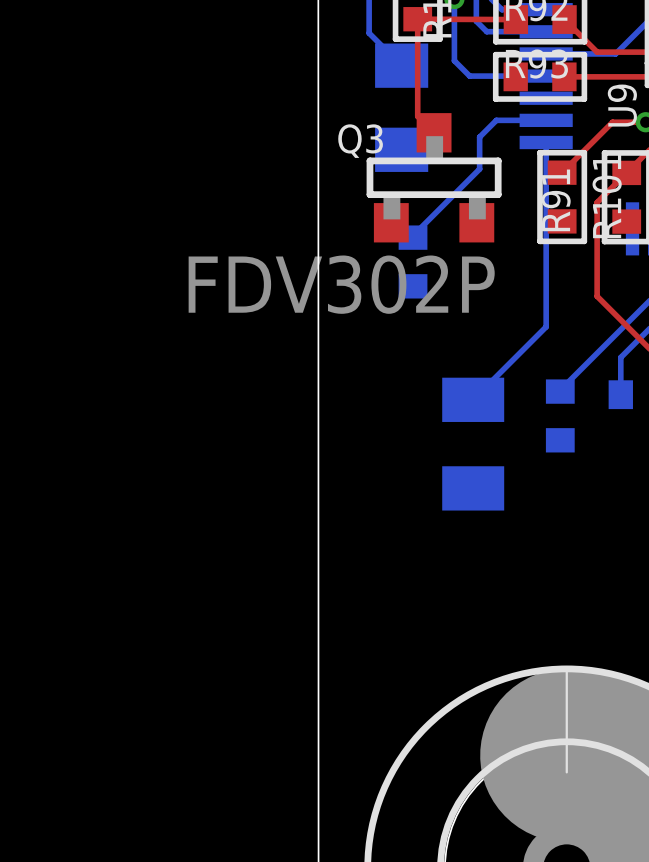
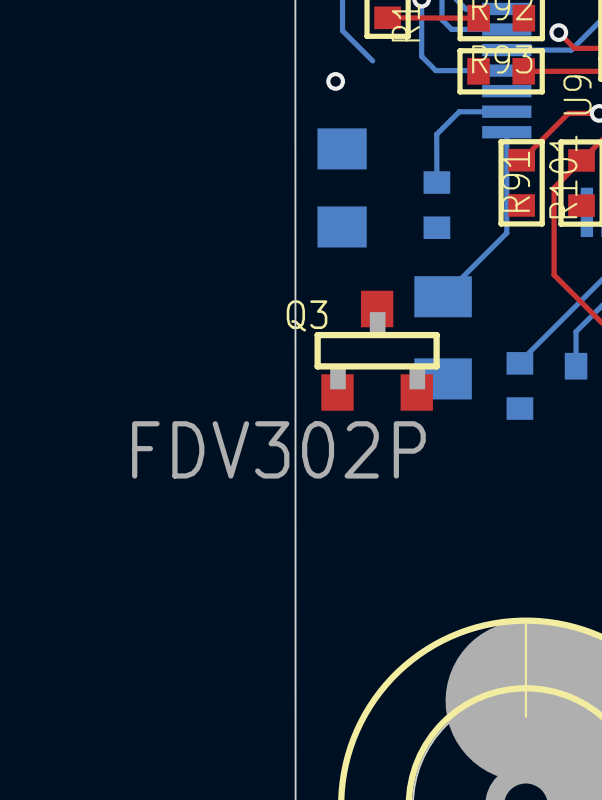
top track: (413, 19) (417, 19) (417, 116) (434, 132) -> none
top track: (564, 19) (597, 52) (619, 52) -> (558, 32) (574, 48)
via: none -> (558, 32)
via: none -> (335, 81)
part position: (401, 107) -> (342, 187)
bottom track: (496, 120) (479, 137) (479, 169) (413, 237) -> (460, 111) (436, 134) (436, 182)
Q3 position: (434, 177) -> (377, 350)
bottom track: (546, 251) (546, 326) (473, 399) -> (506, 233) (443, 296)
part position: (413, 261) -> (436, 205)
part position: (473, 444) -> (443, 337)

